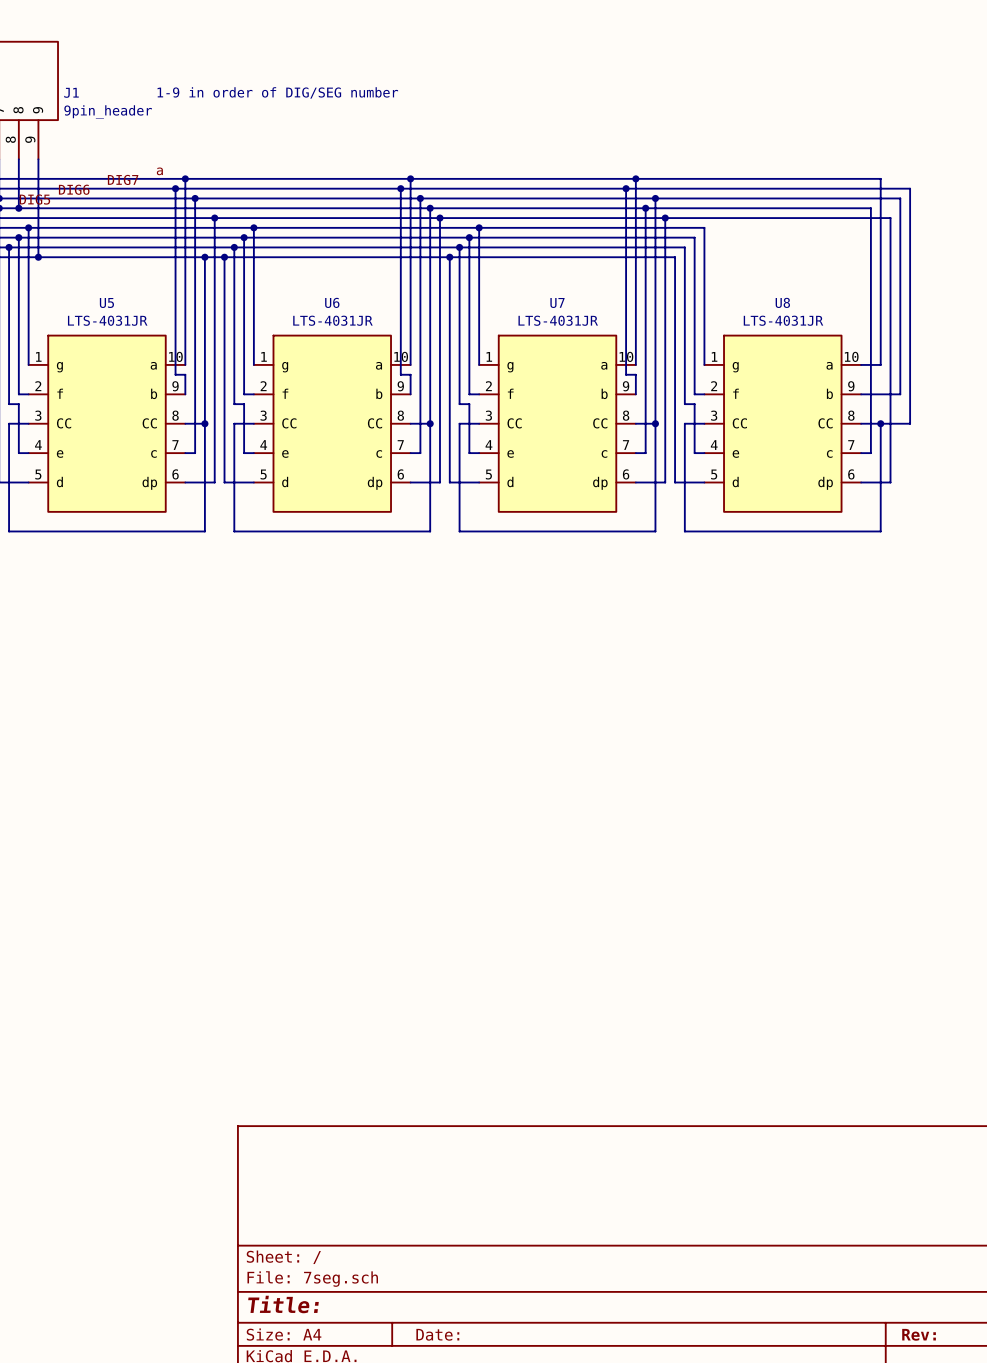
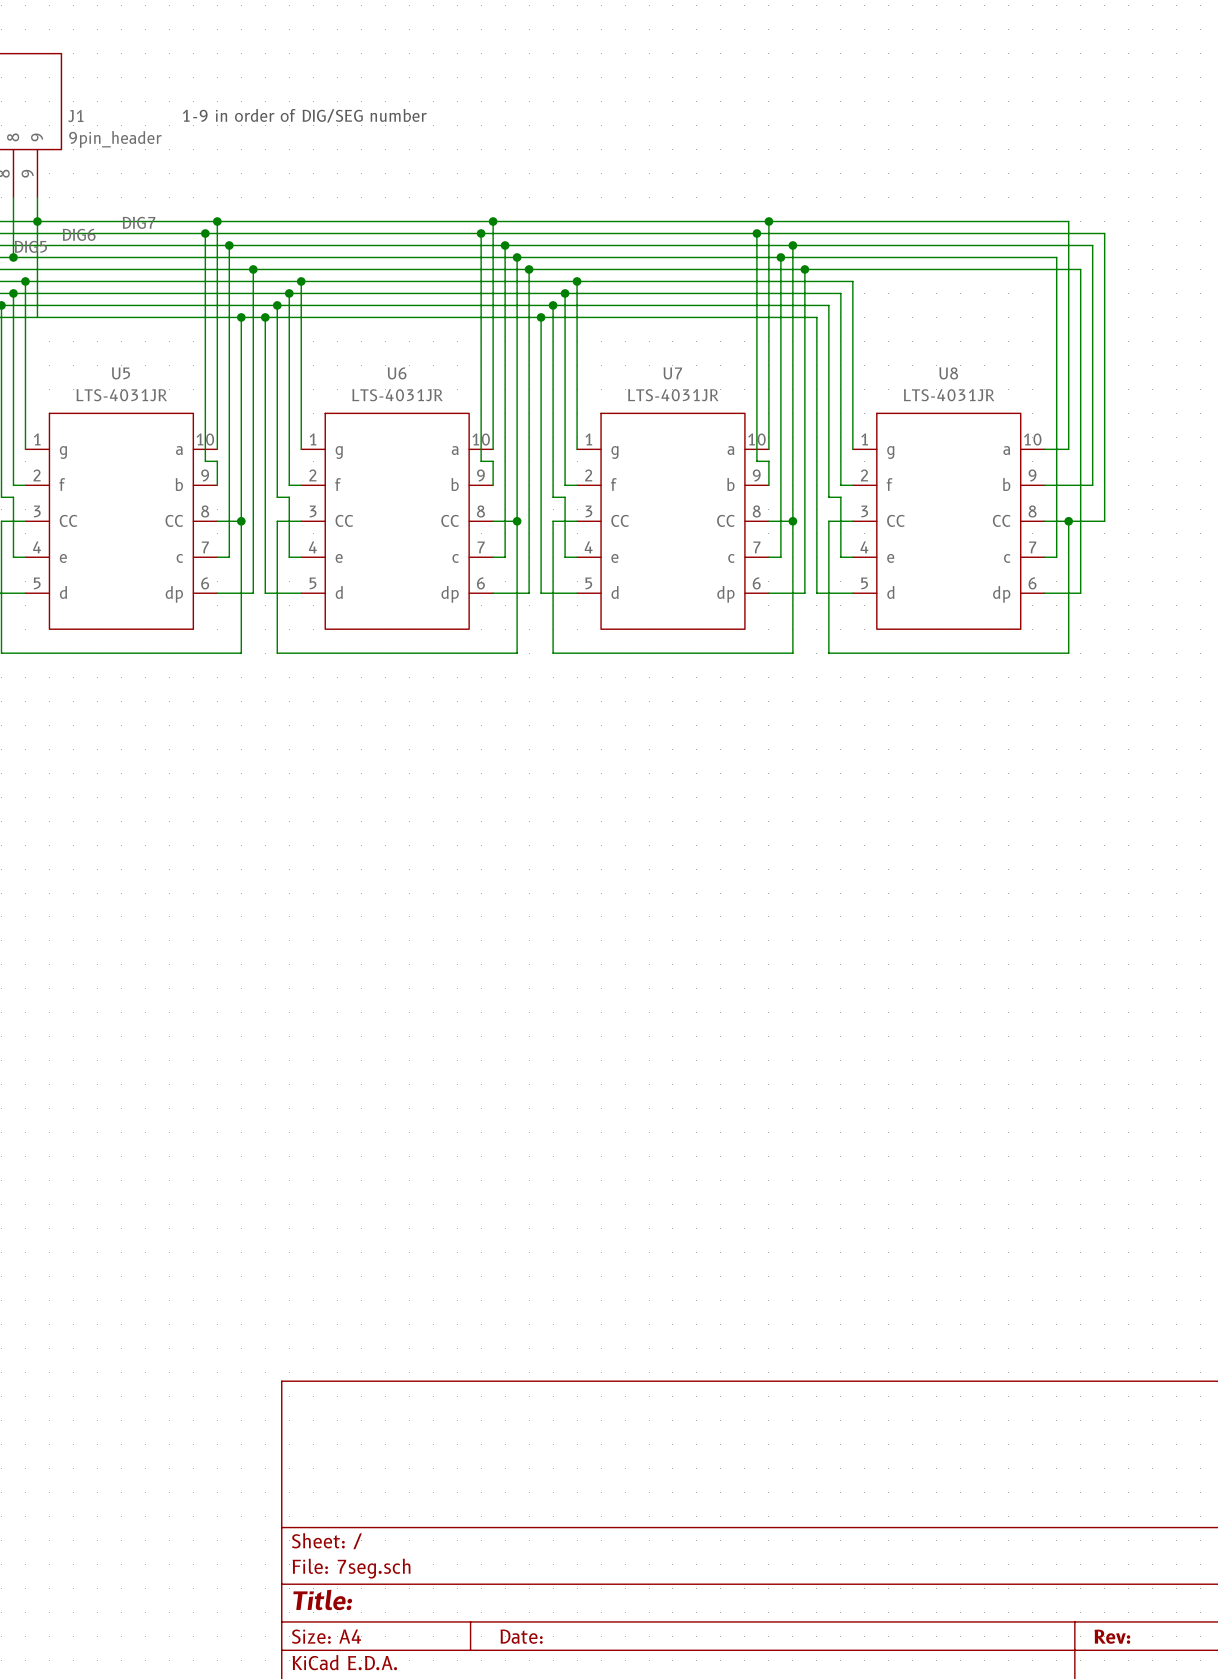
label: a (159, 171) -> none
junction: none -> (37, 221)
junction: (38, 257) -> none

